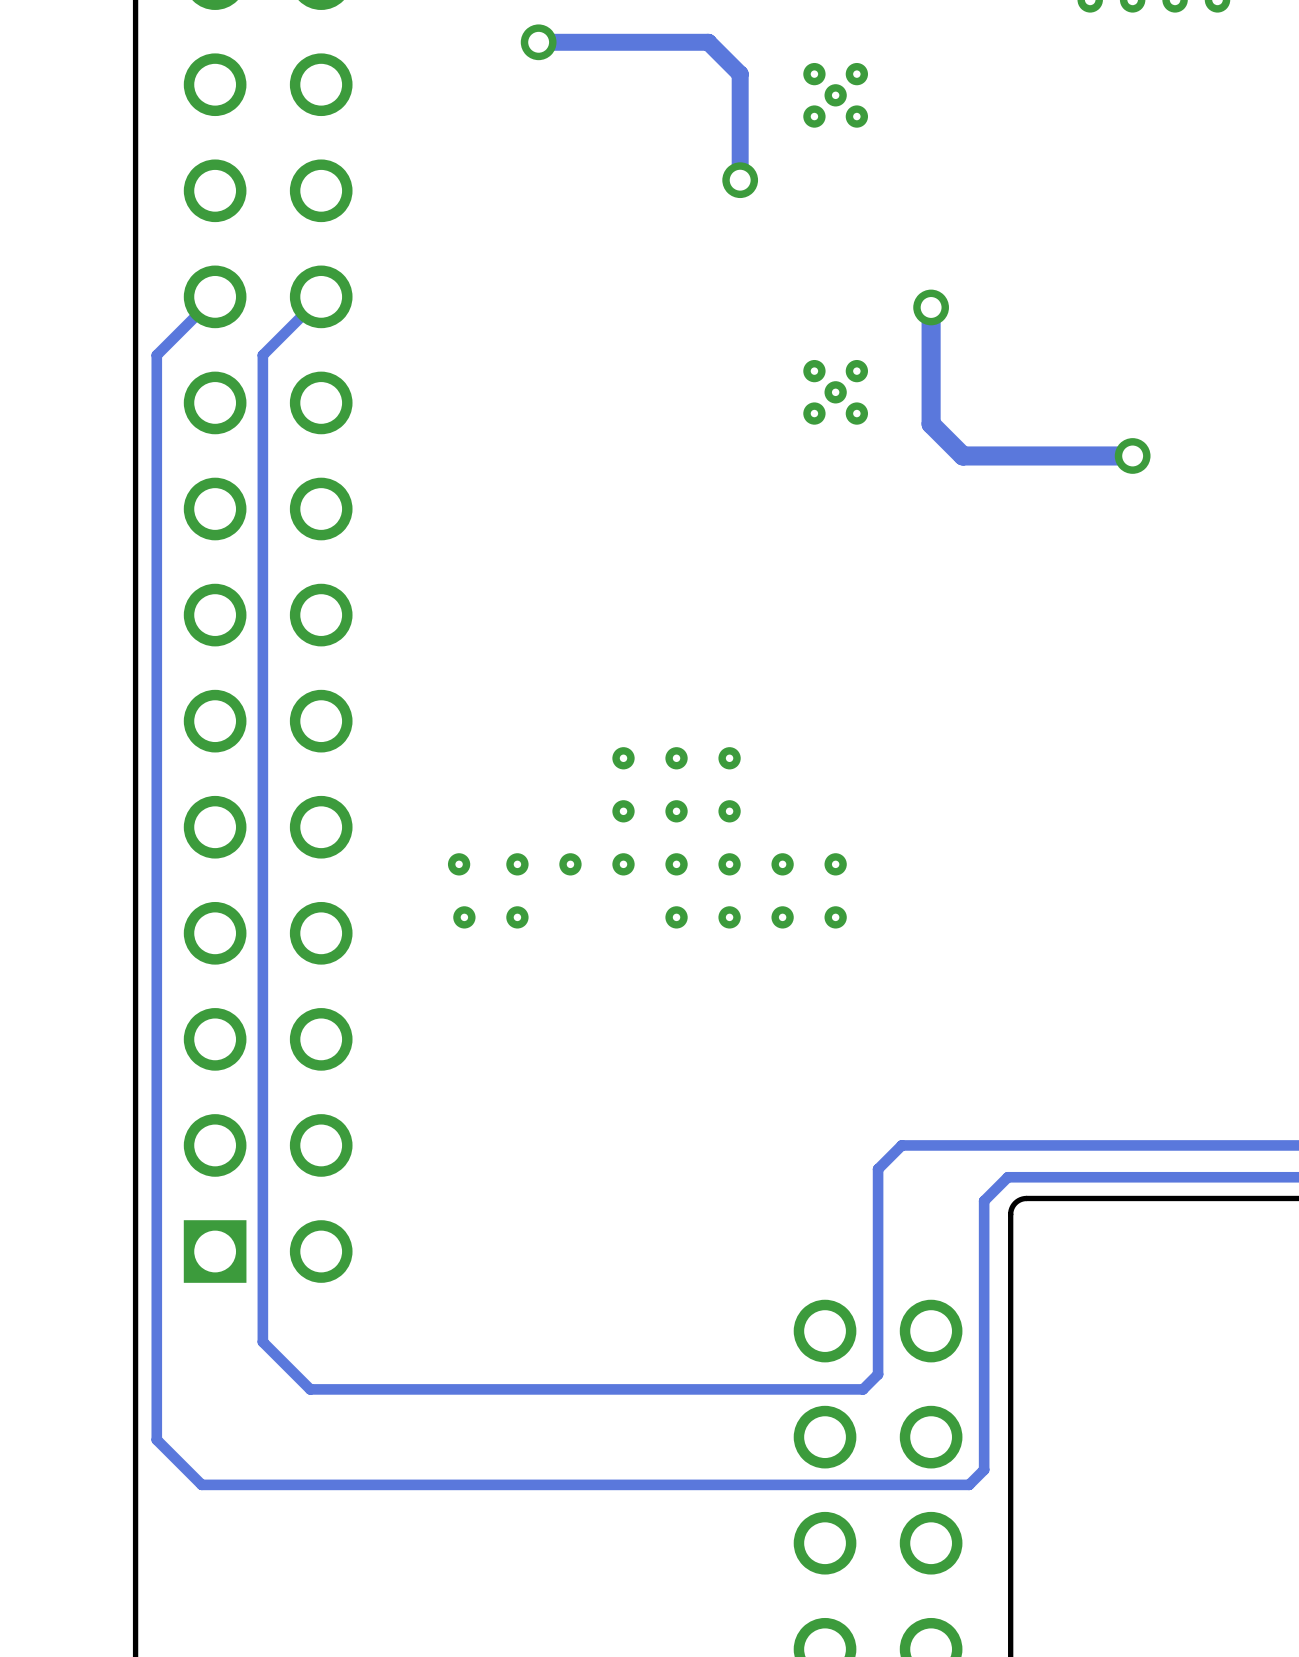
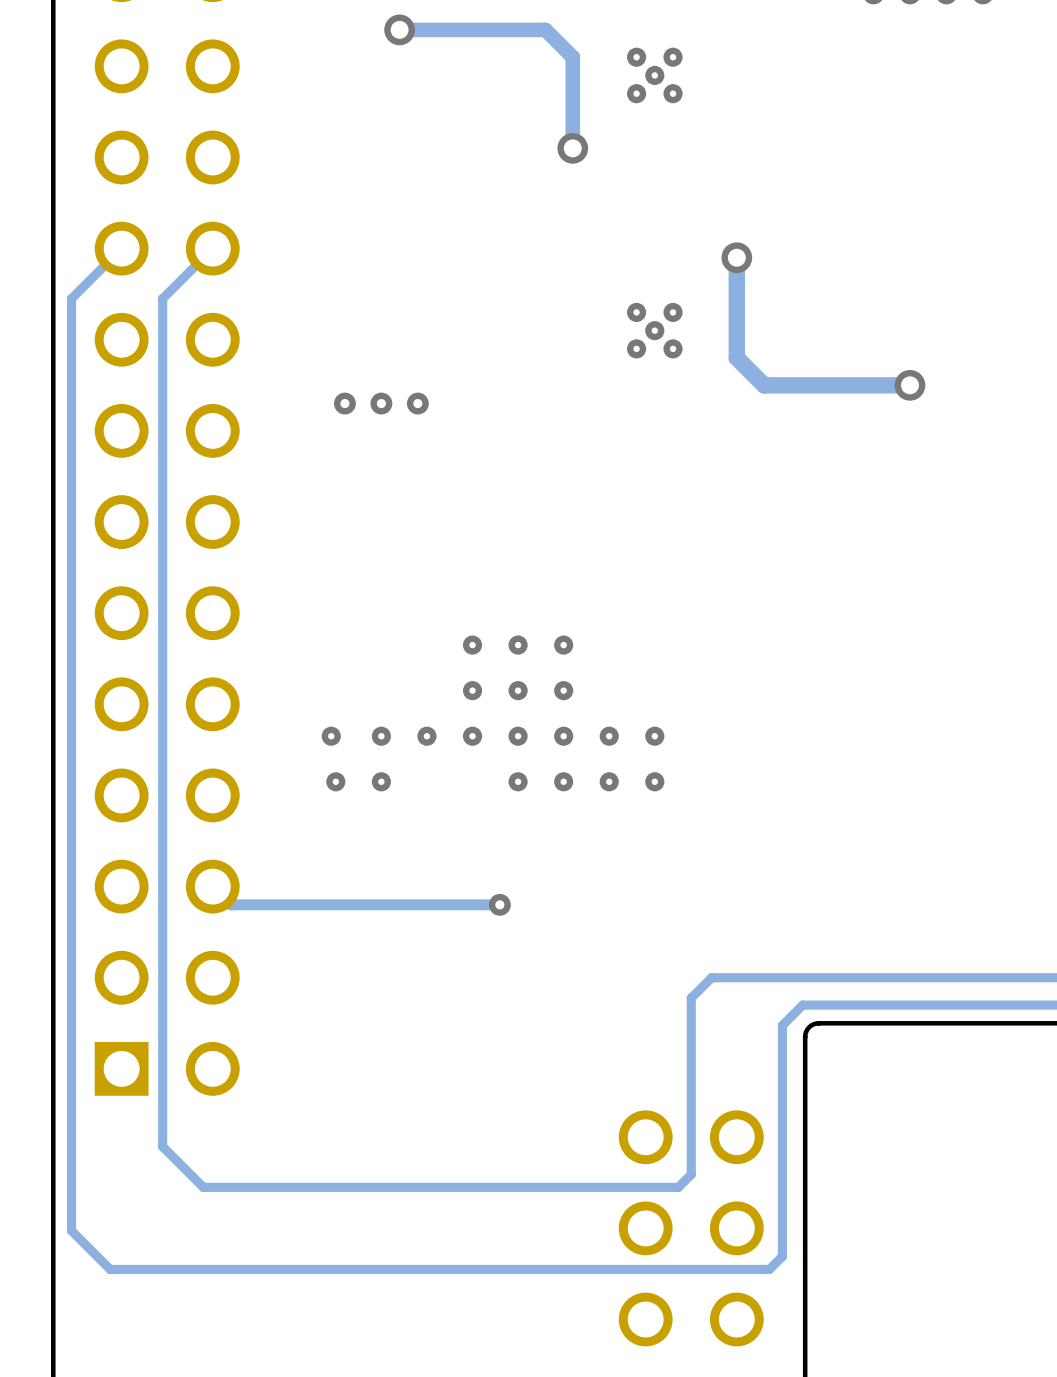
via: none -> (344, 403)
via: none -> (381, 403)
via: none -> (417, 403)
track: none -> (212, 886) (231, 904) (499, 904)
via: none -> (499, 904)

